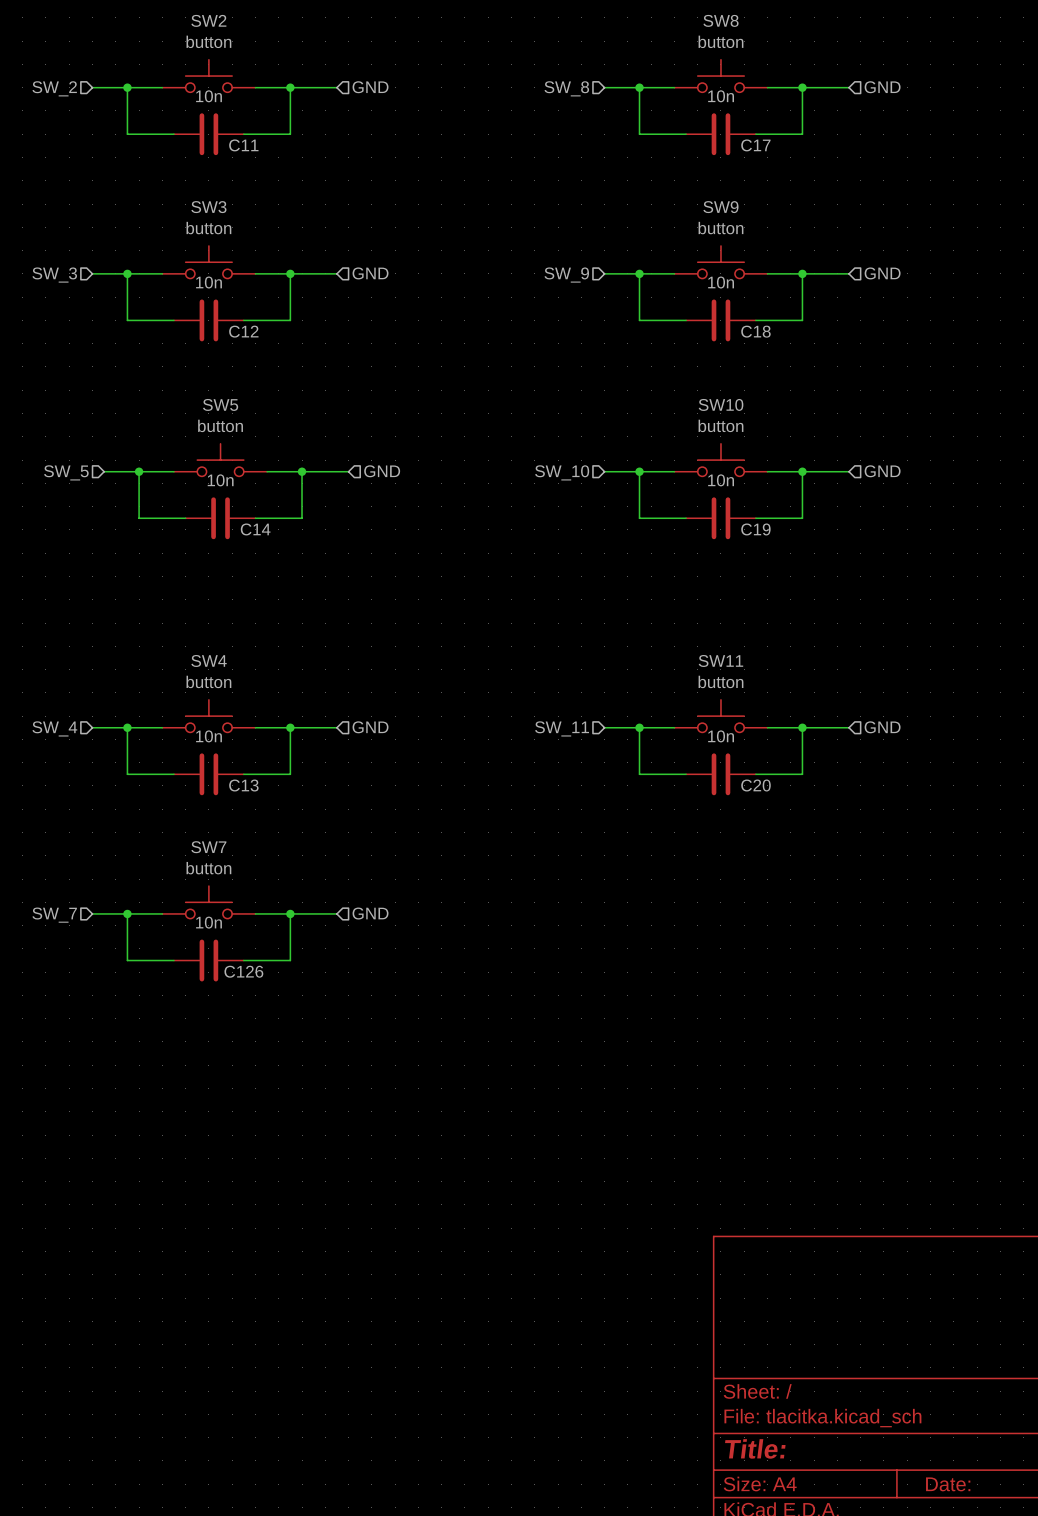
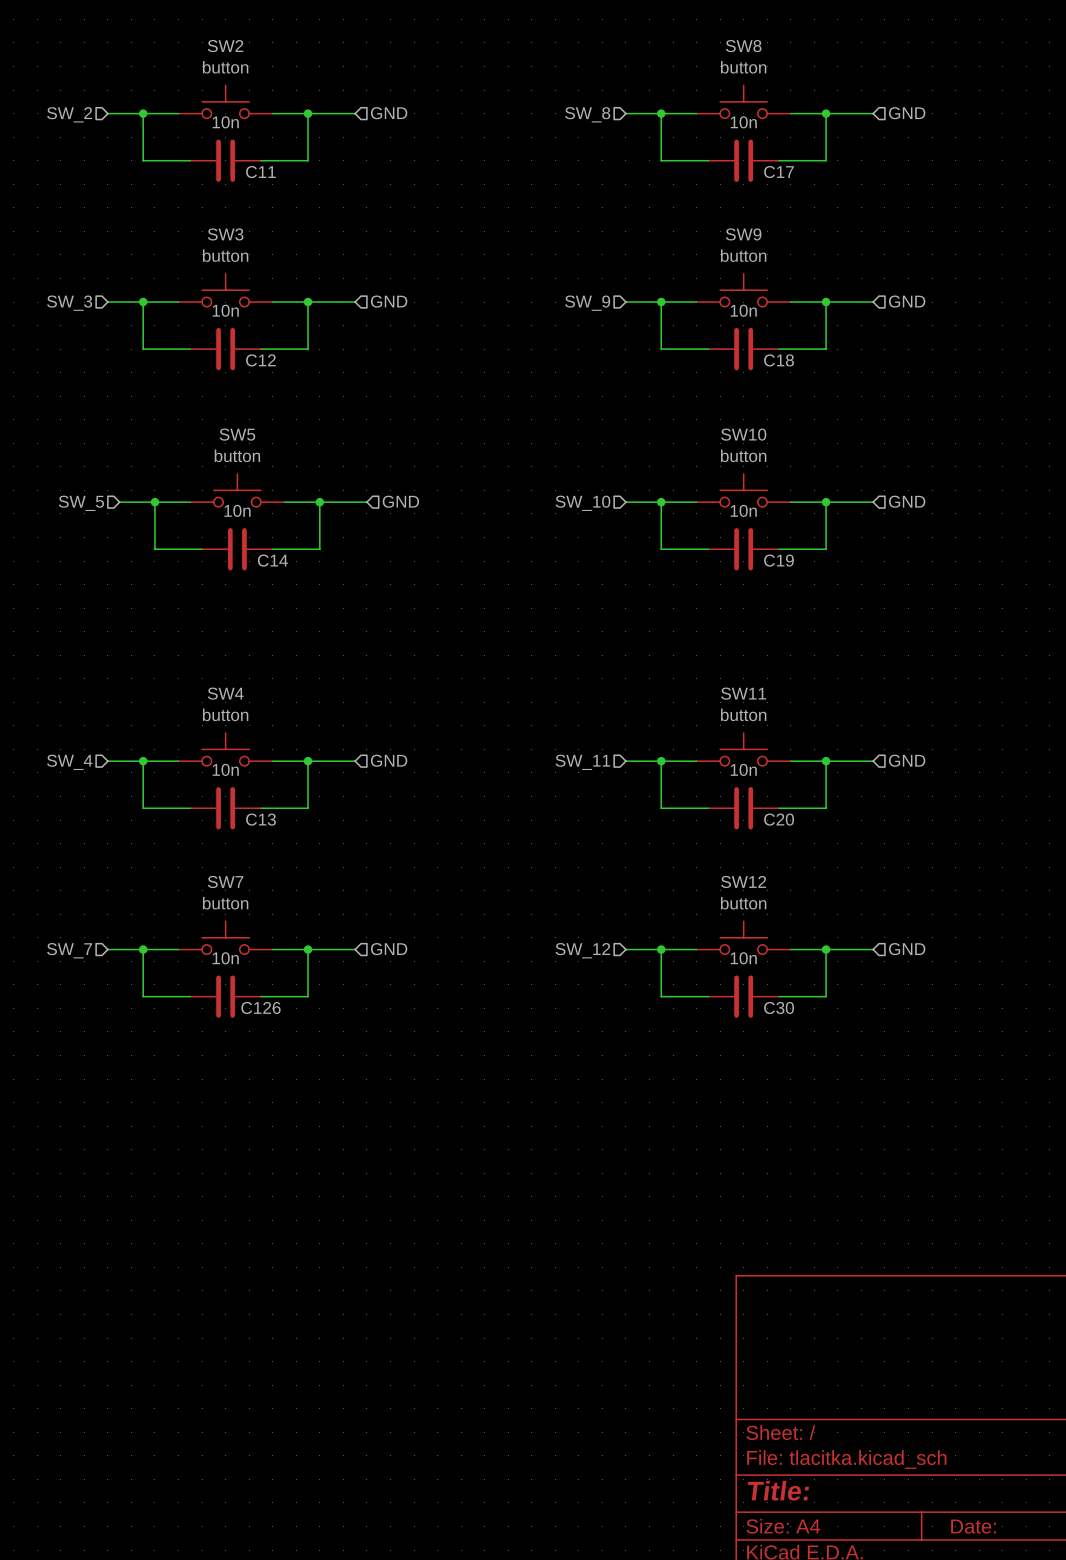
SW12: none -> button (743, 937)
wire: none -> (625, 949) (696, 949)
wire: none -> (661, 949) (661, 996) (708, 996)
junction: none -> (661, 949)
wire: none -> (790, 949) (873, 949)
wire: none -> (826, 949) (826, 996) (778, 996)
junction: none -> (826, 949)
hierarchical label: none -> GND (907, 949)
hierarchical label: none -> SW_12 (582, 950)
C30: none -> 10n (743, 996)

